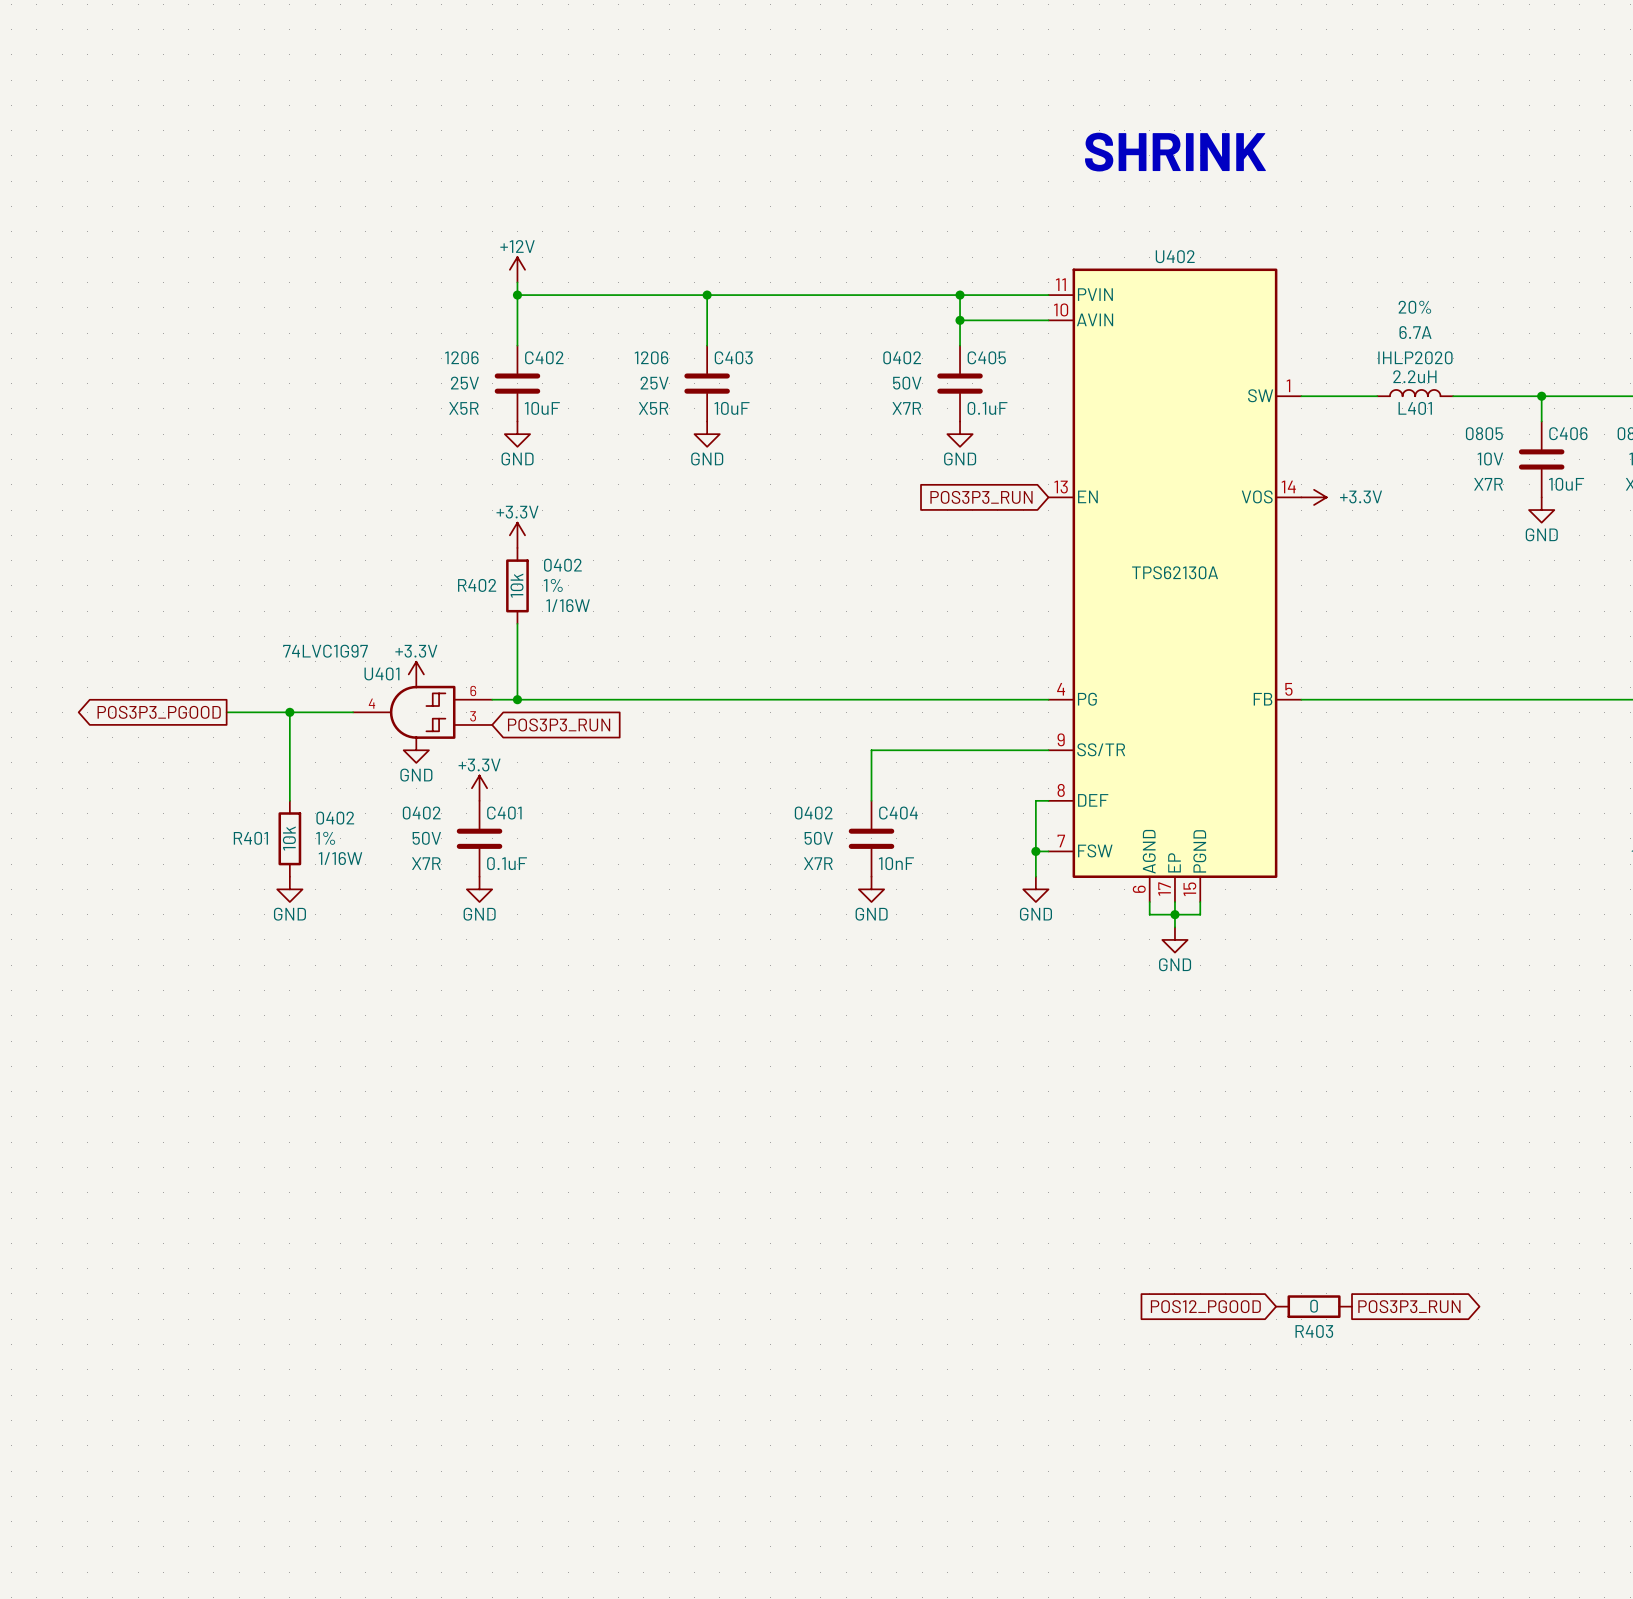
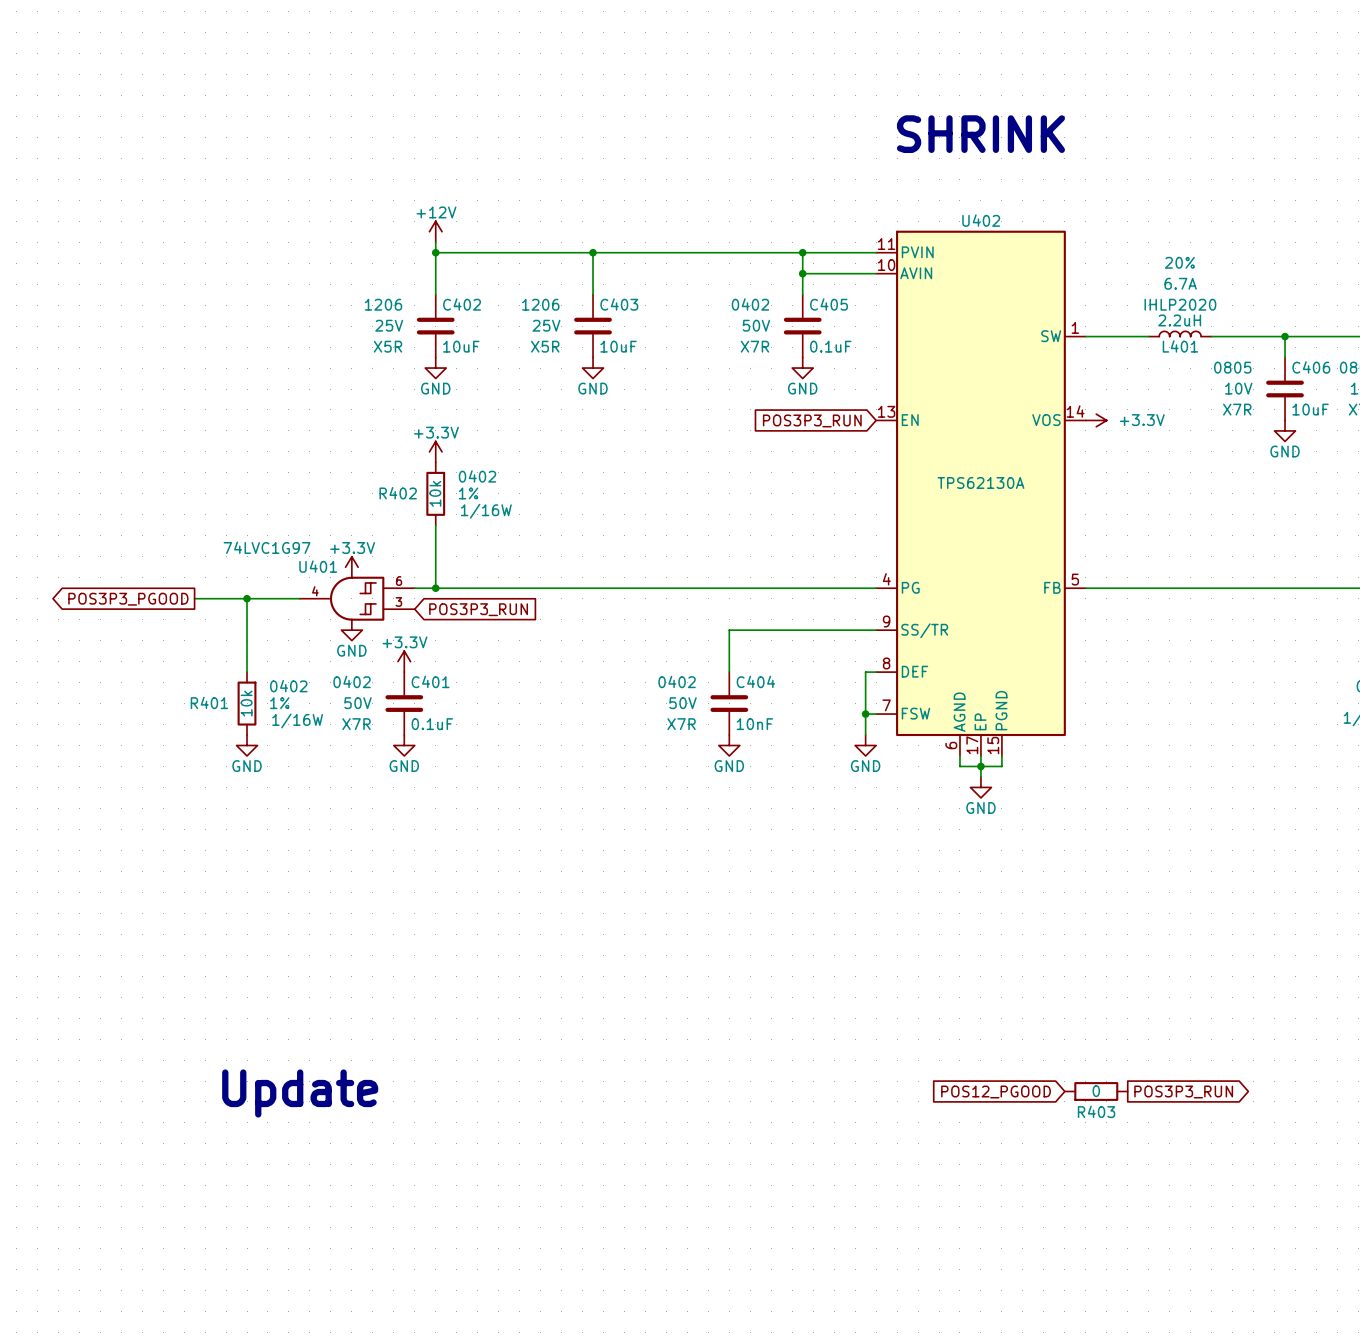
text: none -> Update (300, 1093)

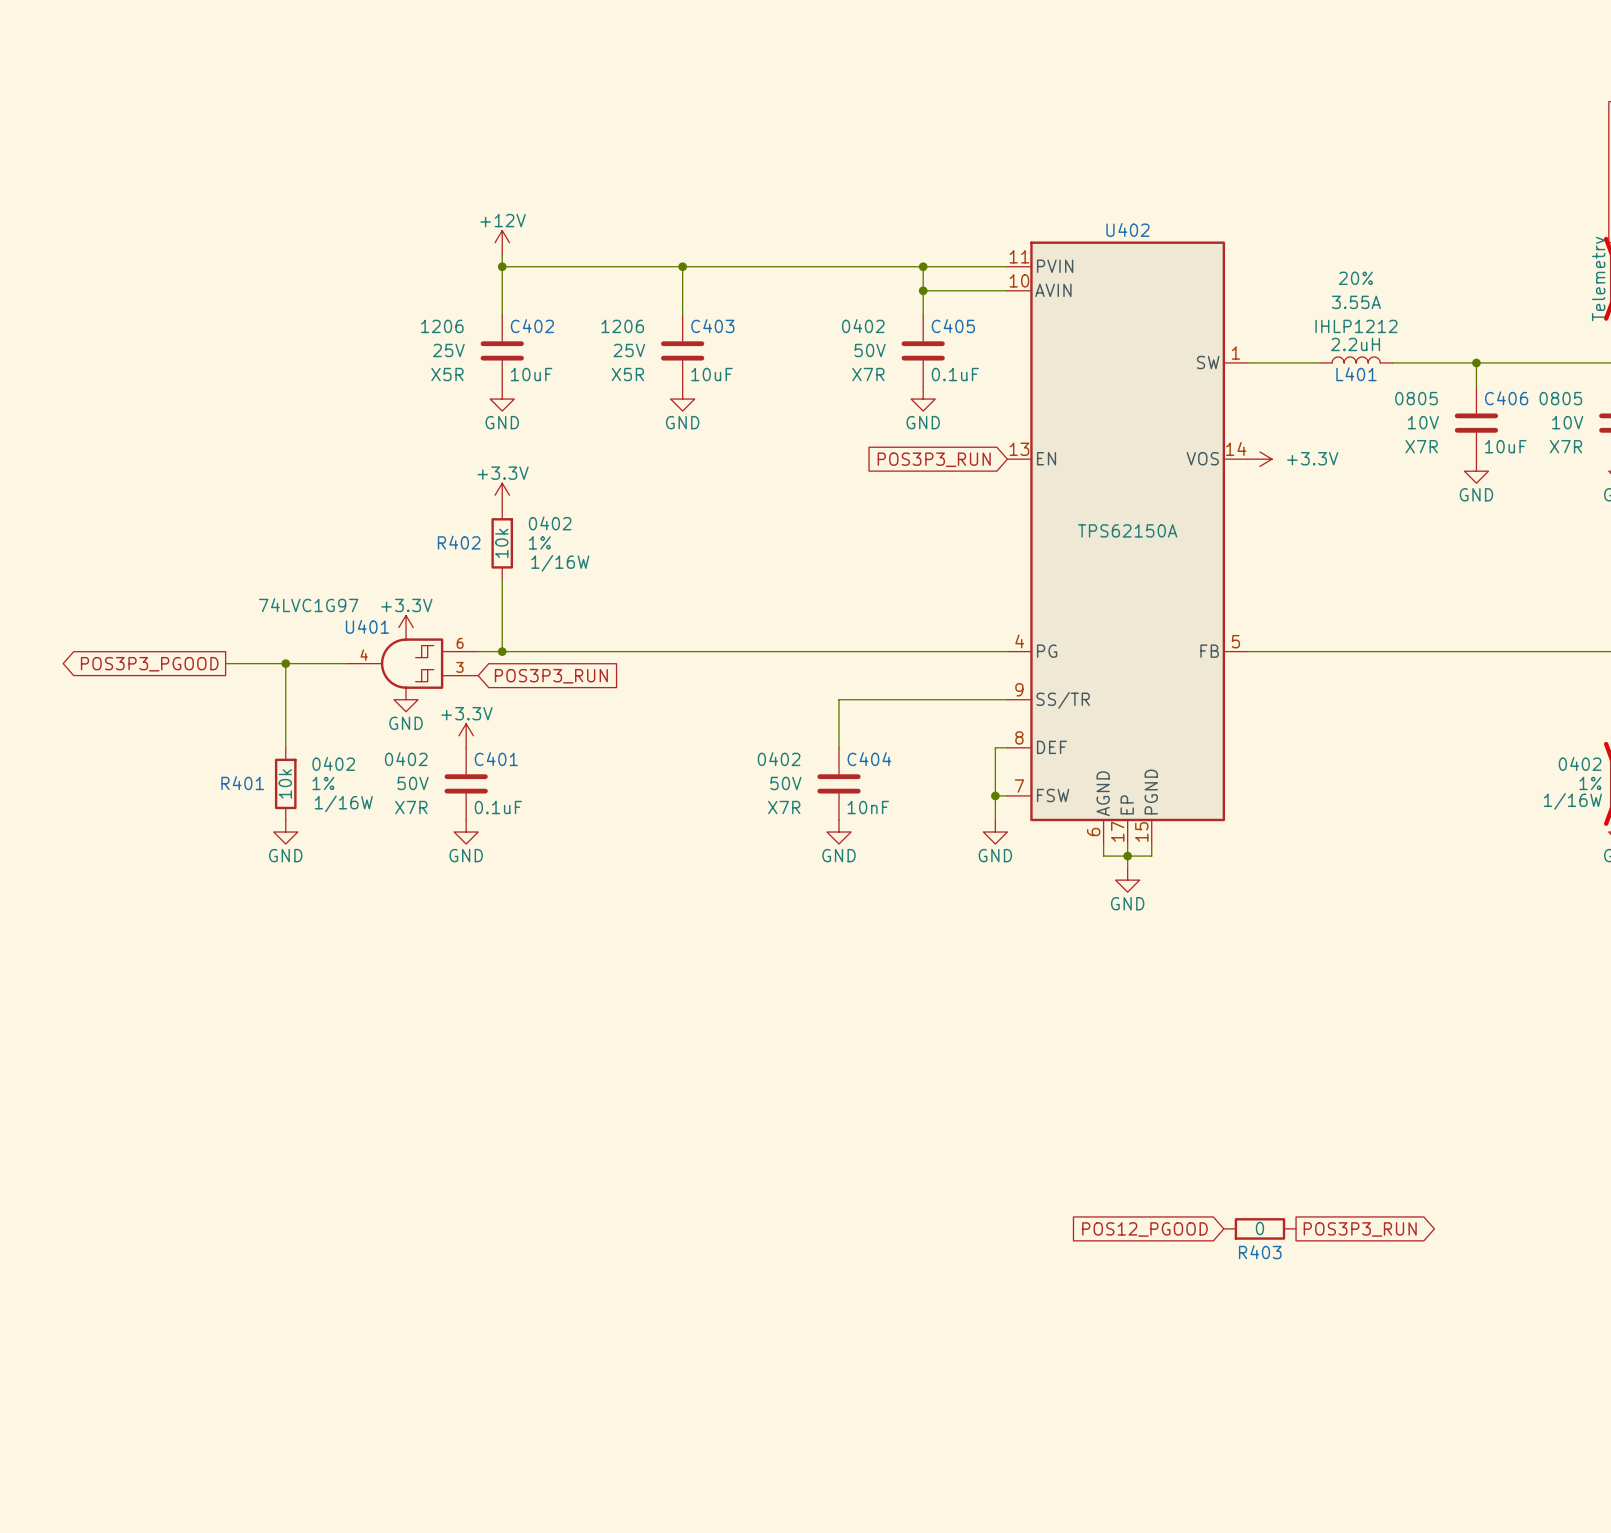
text: SHRINK (980, 134) -> none
L401 text: 6.7A (1180, 283) -> 3.55A (1356, 302)
L401 text: IHLP2020 (1180, 304) -> IHLP1212 (1356, 326)
U402 value: TPS62130A (980, 482) -> TPS62150A (1127, 530)
text: Update (300, 1093) -> none

